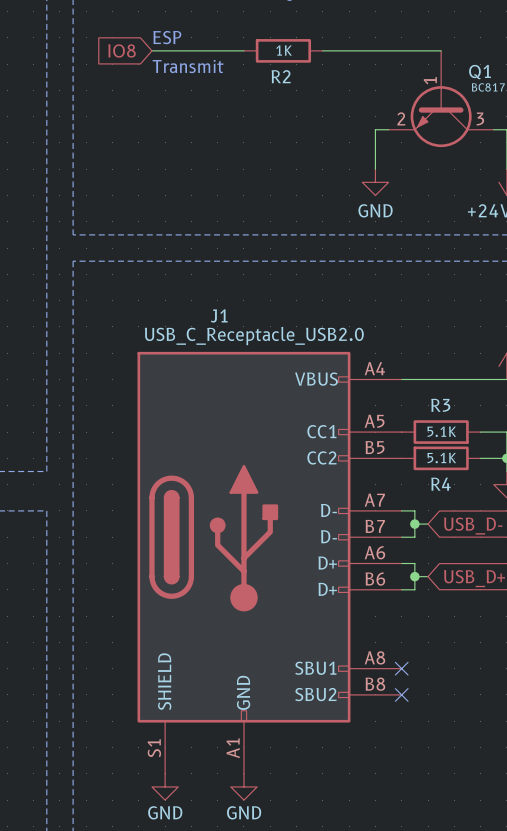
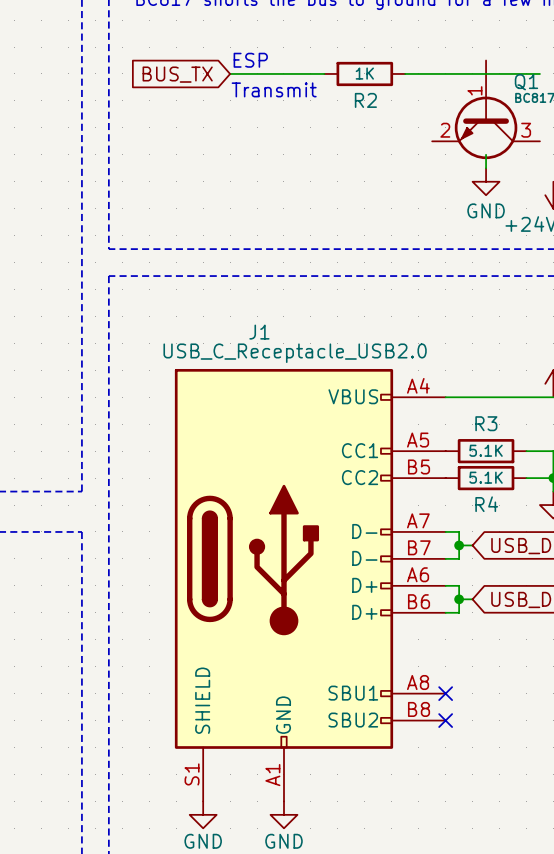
text position: ESP (167, 37) -> ESP (250, 60)
global label: IO8 (122, 50) -> none
wire: (151, 50) (243, 50) -> (230, 73) (324, 73)
R2 position: (283, 50) -> (364, 73)
wire: (322, 50) (441, 50) -> none
wire: none -> (405, 73) (539, 73)
global label: none -> BUS_TX (177, 74)
text position: Transmit (188, 66) -> Transmit (274, 89)
wire: (388, 129) (375, 129) (375, 169) -> none
wire: (493, 129) (506, 129) (506, 169) -> none
wire: none -> (486, 154) (486, 168)
power symbol position: GND (375, 182) -> GND (486, 181)

